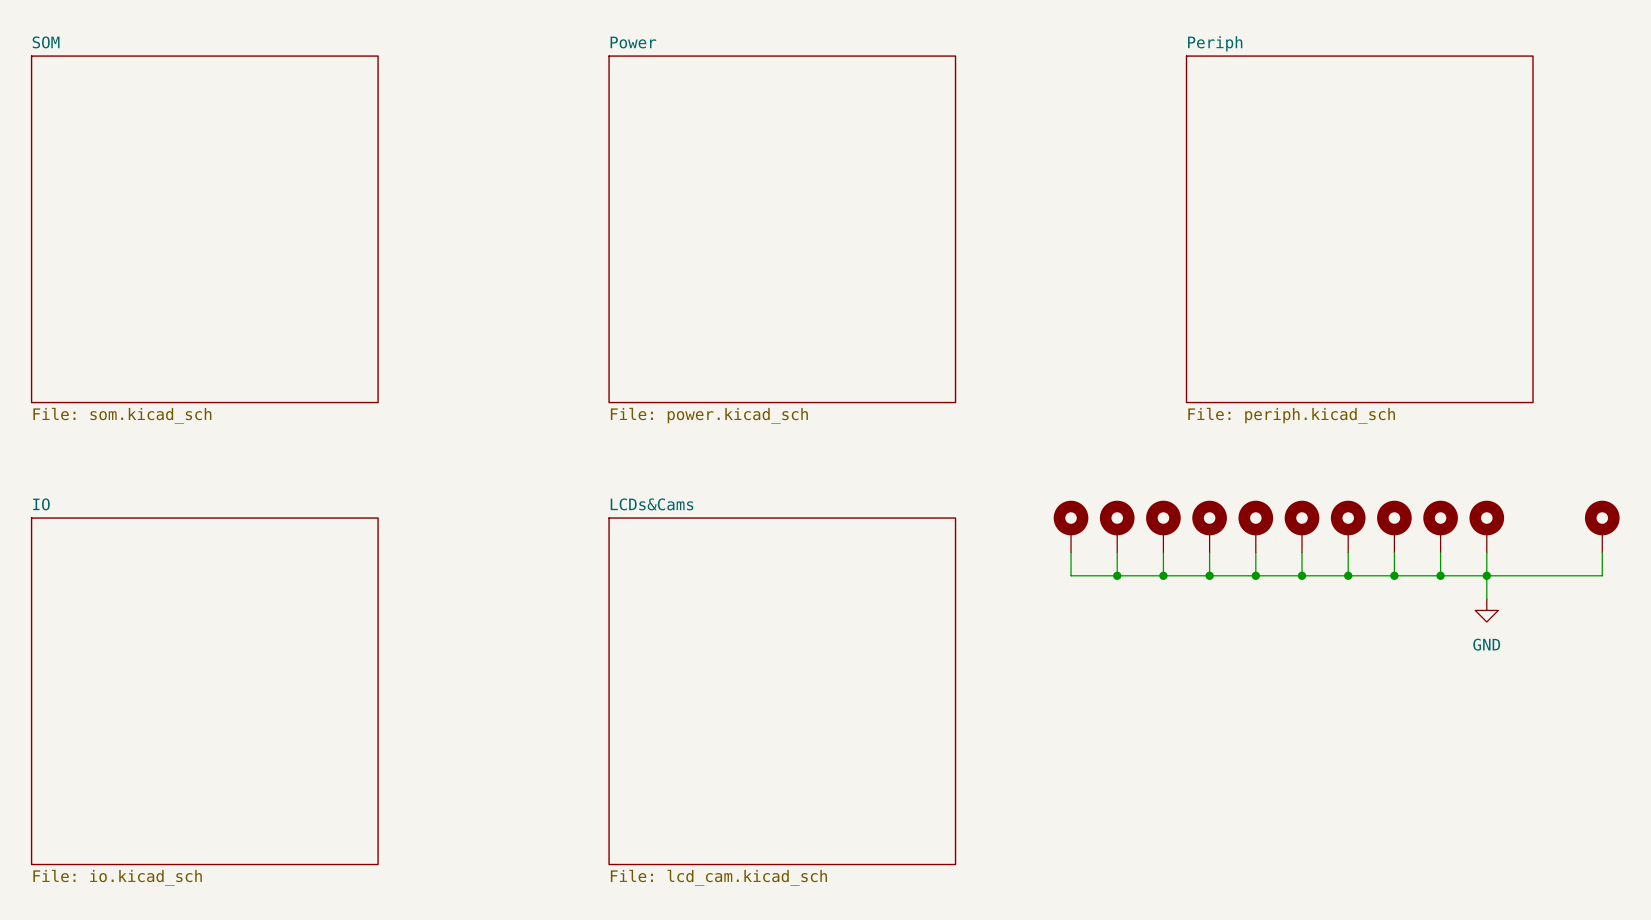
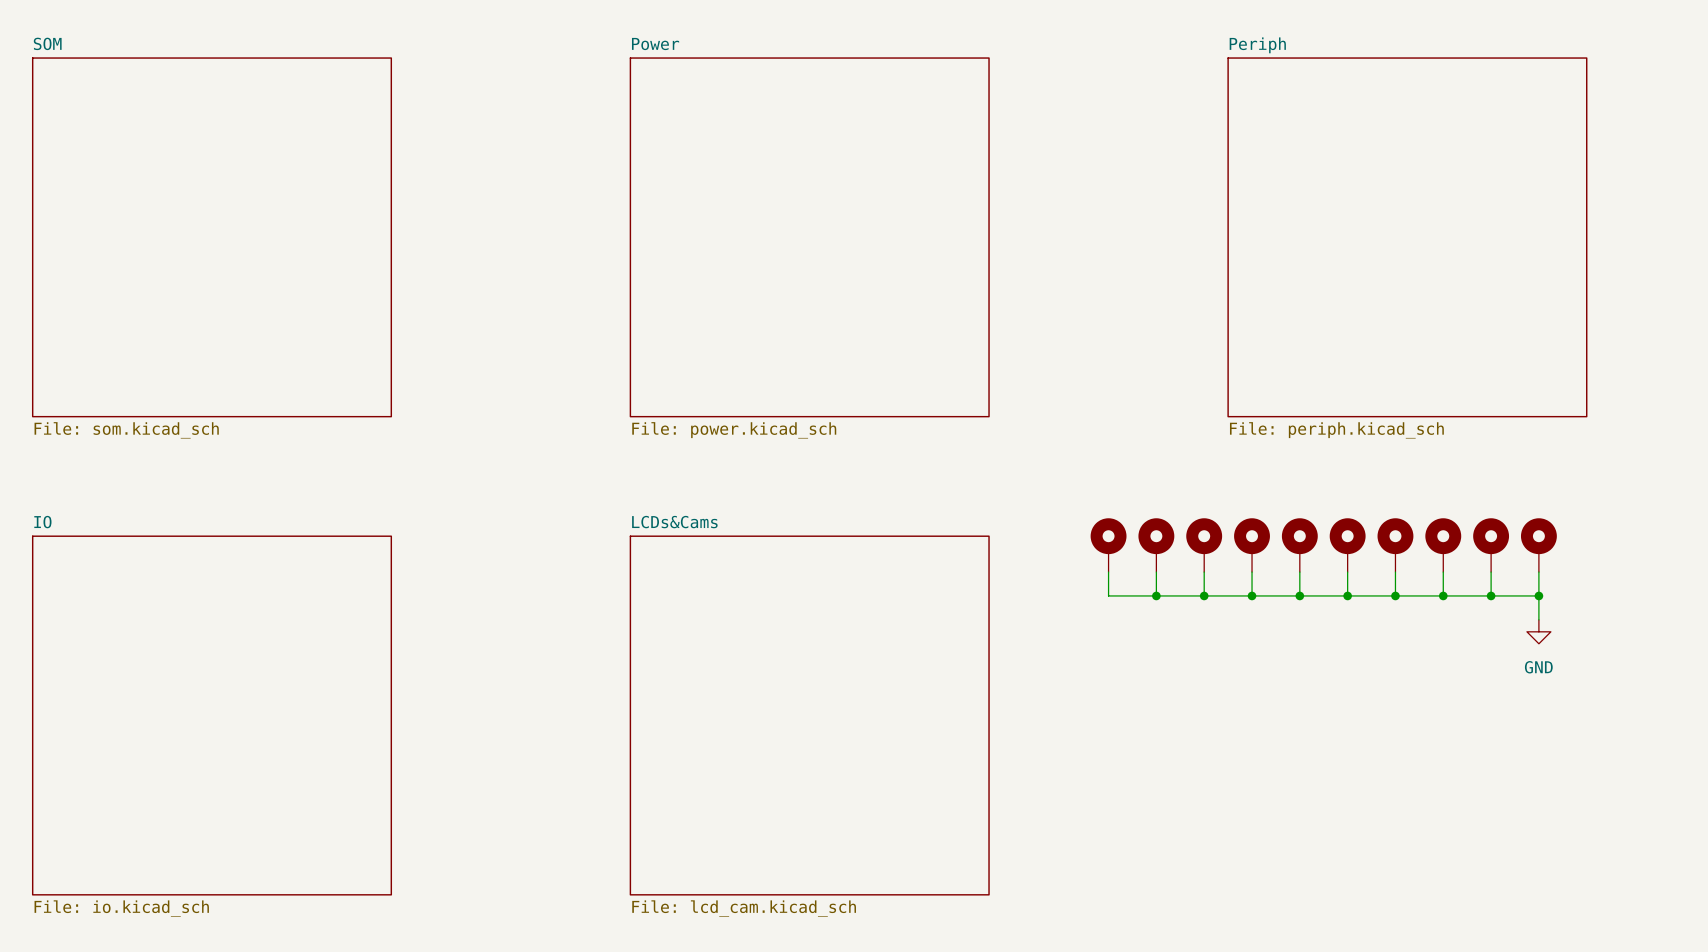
part: (1602, 526) -> none
wire: (1602, 552) (1602, 575) (1486, 575) -> none

